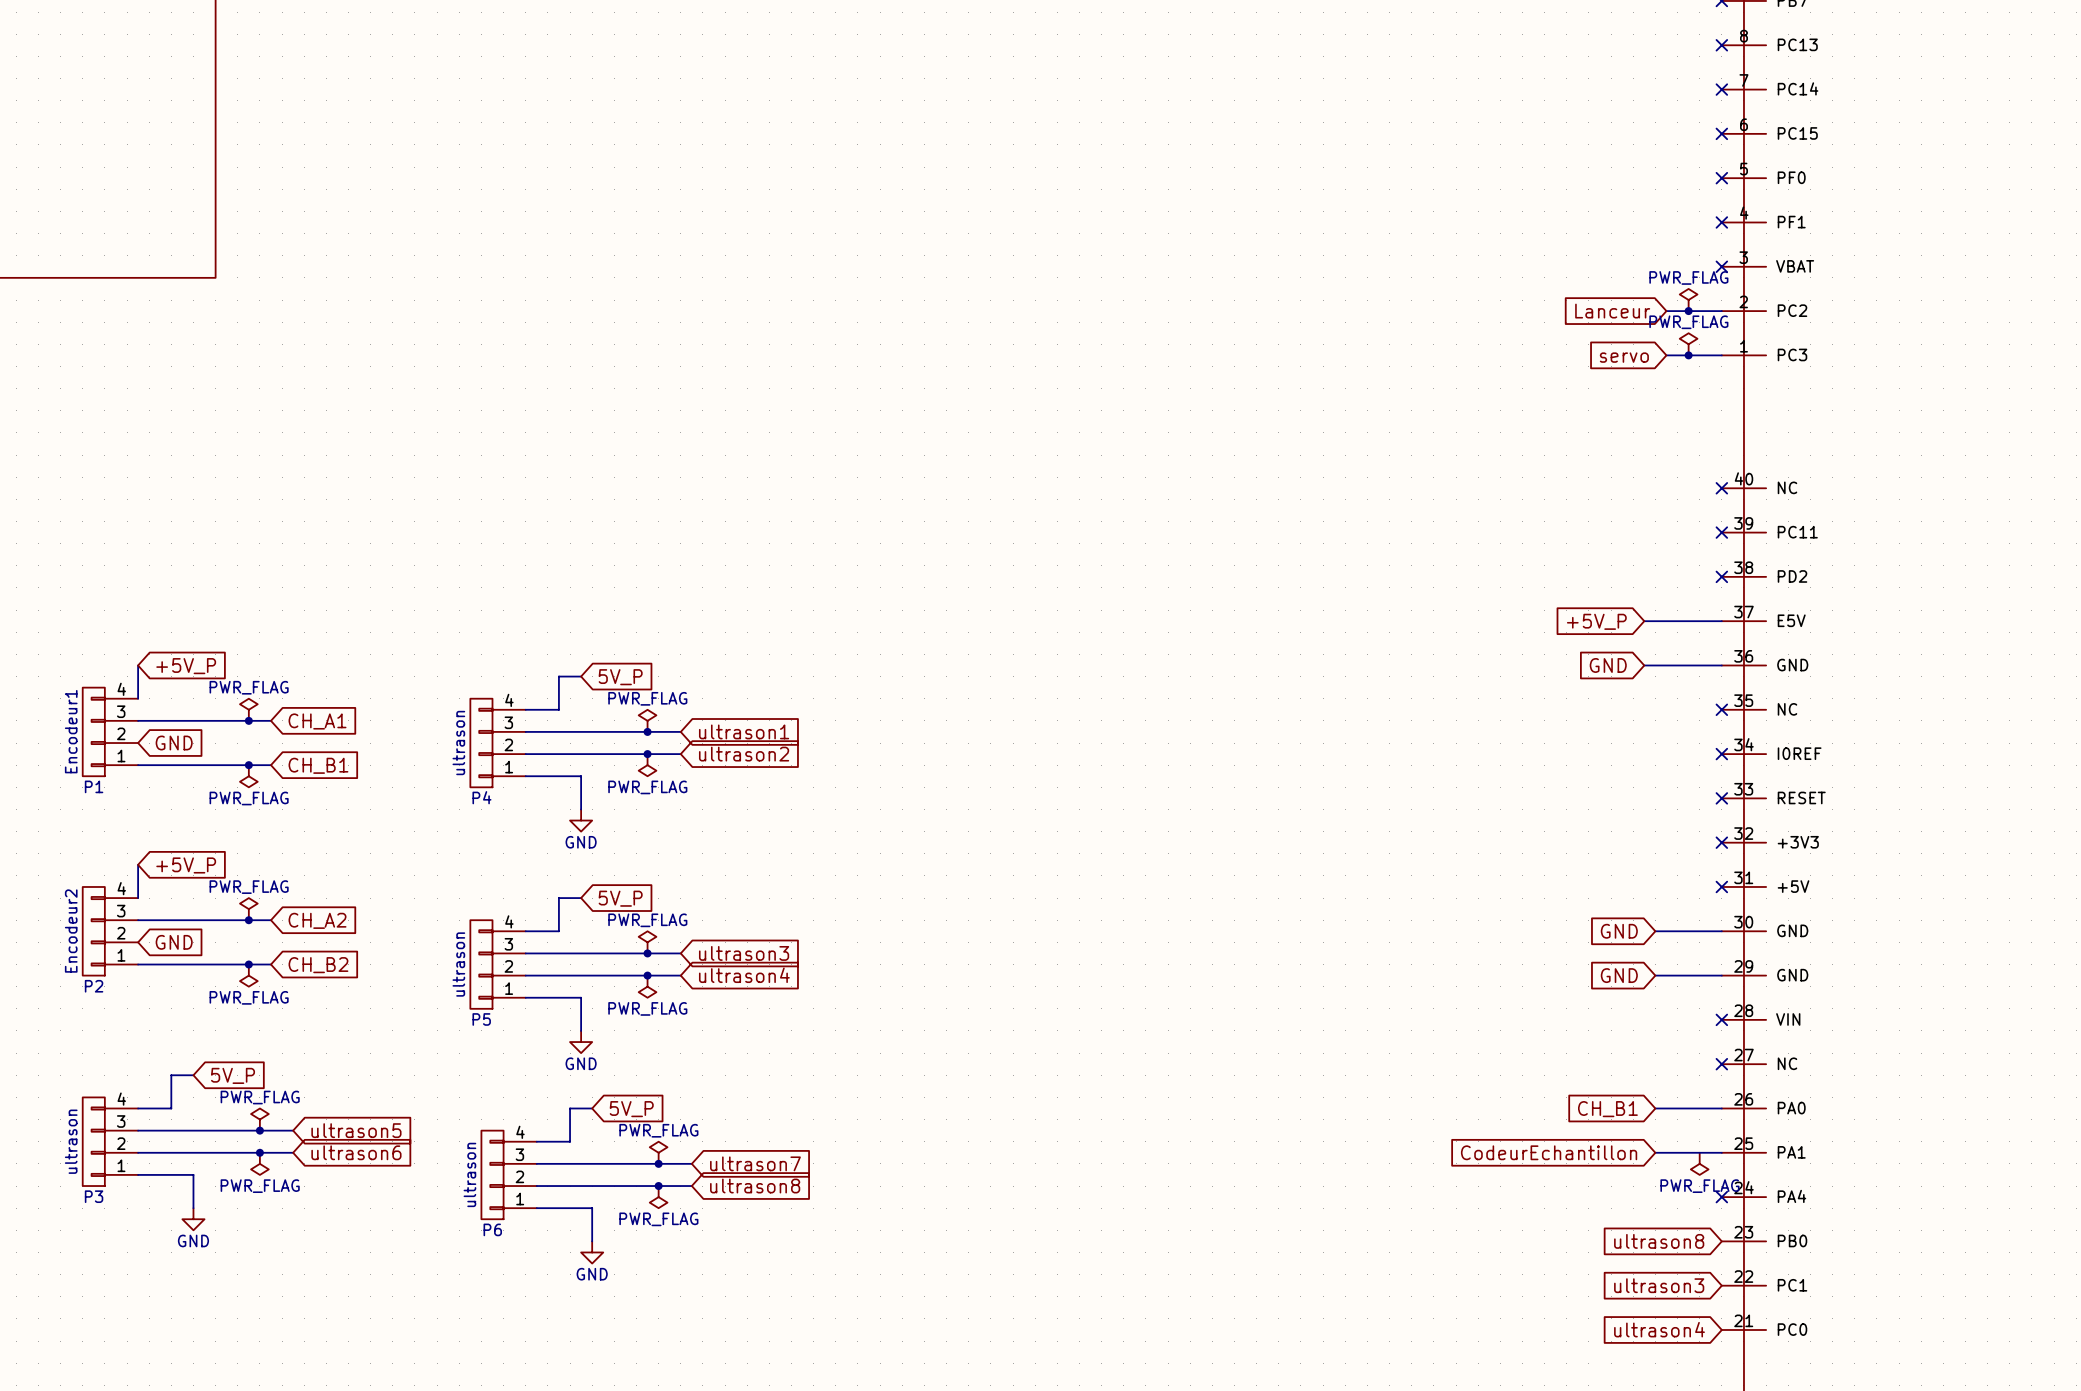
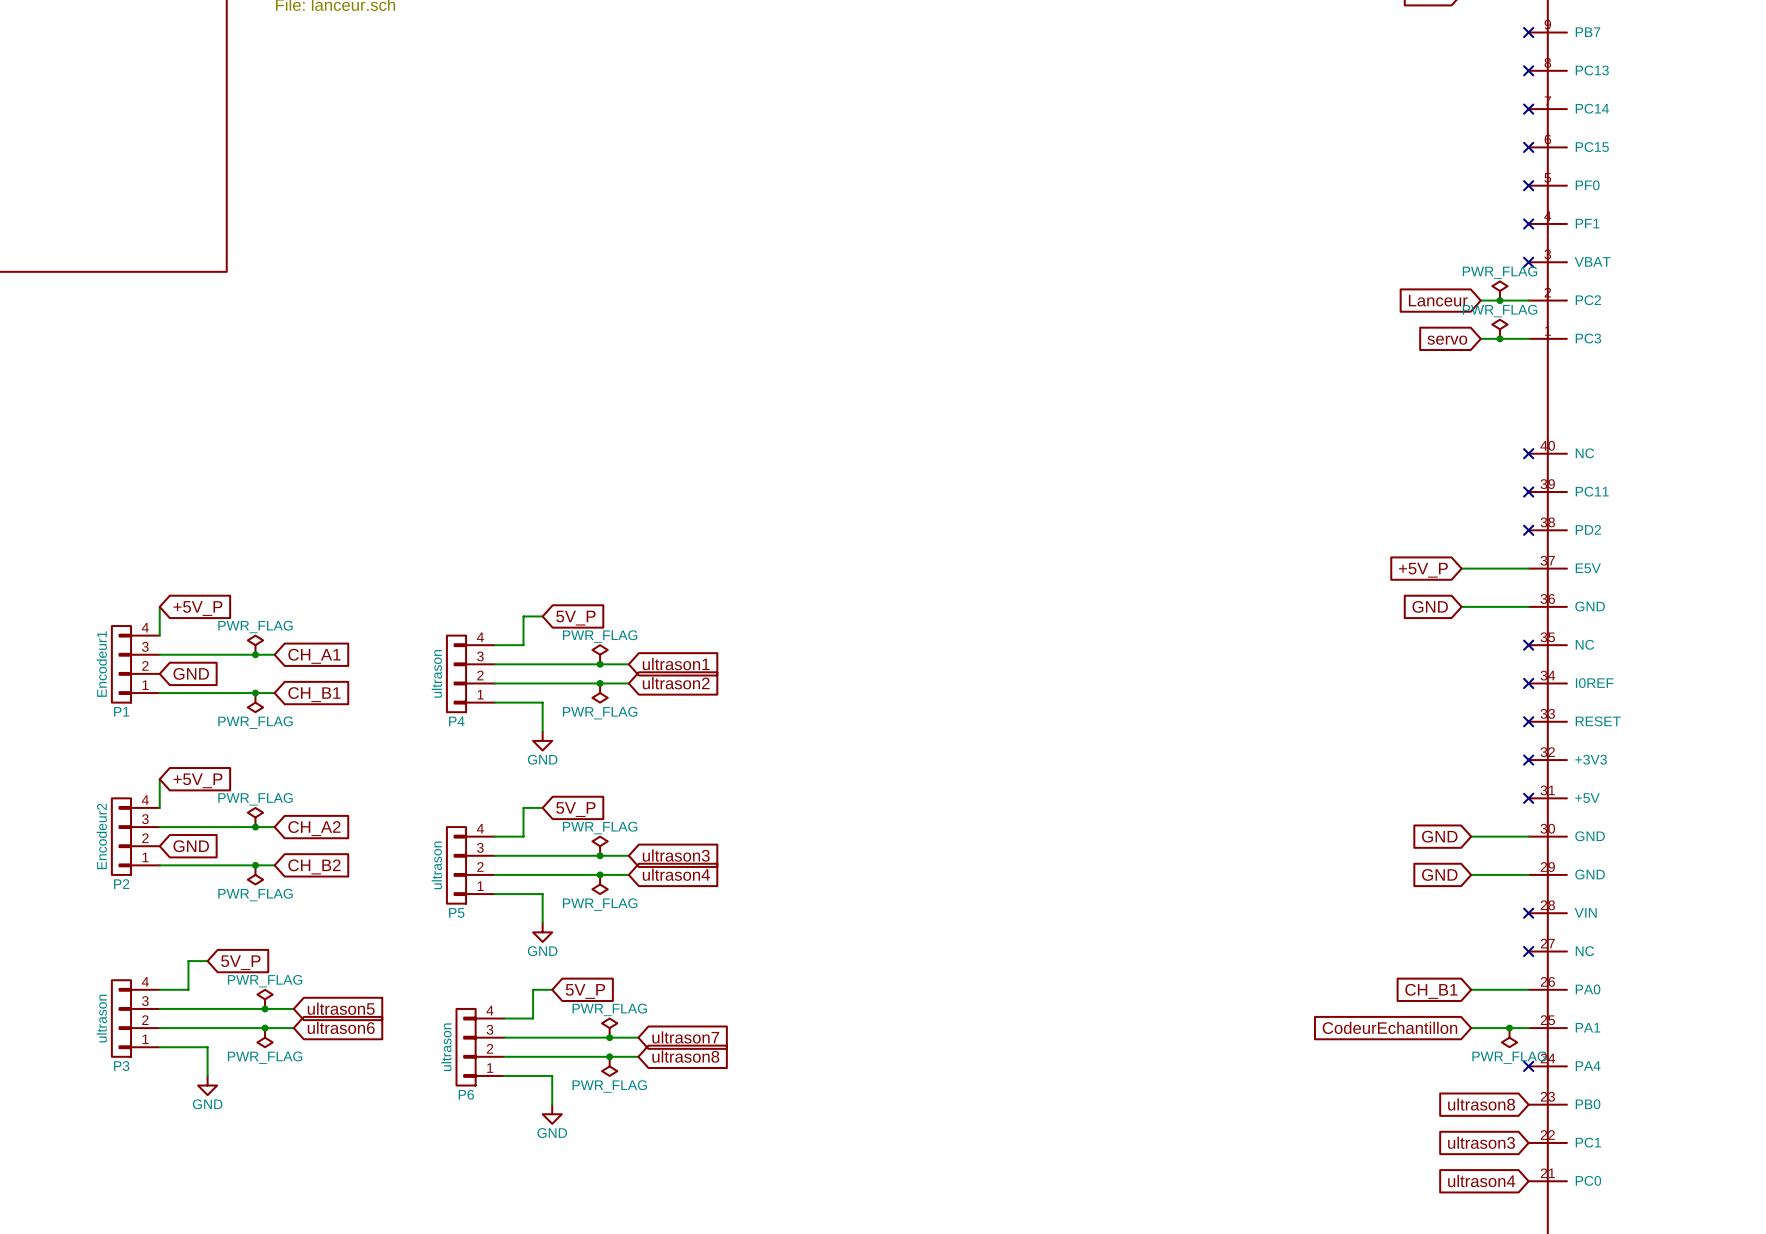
junction: none -> (1509, 1028)

